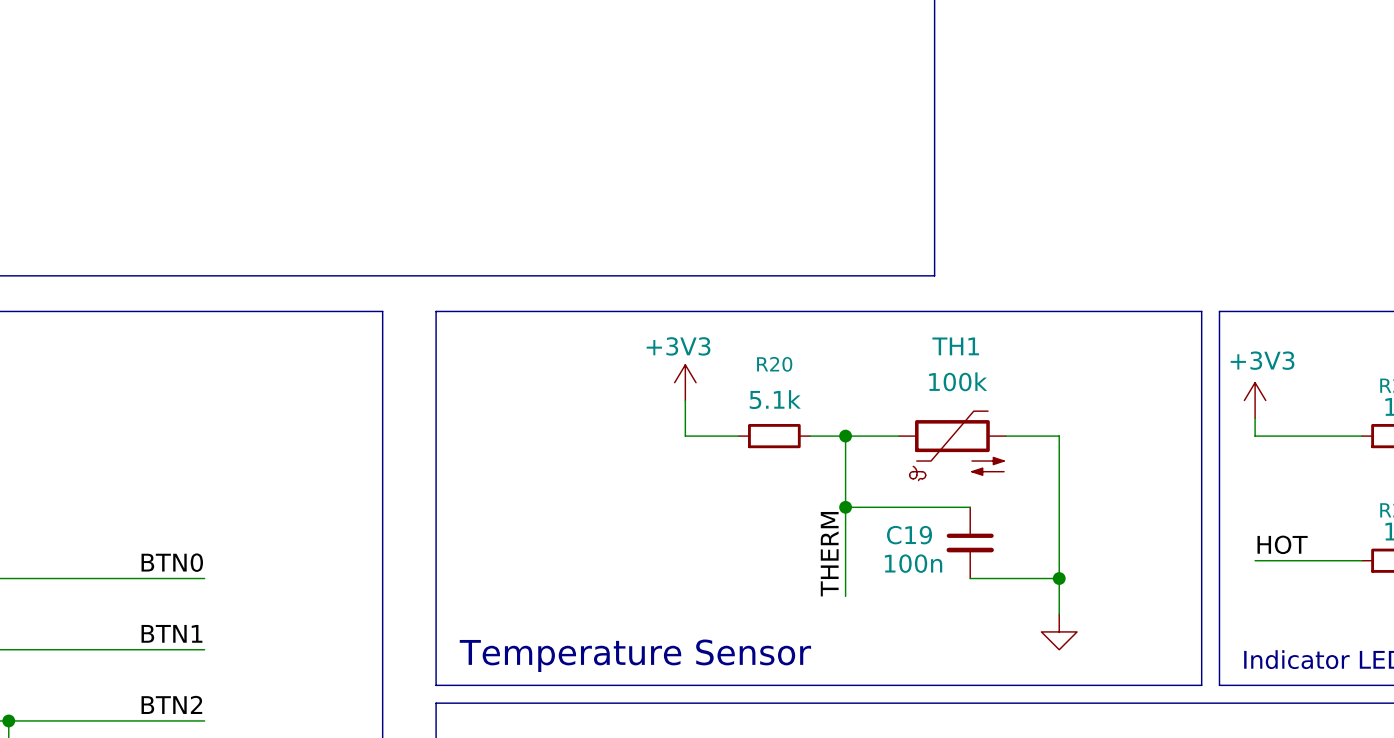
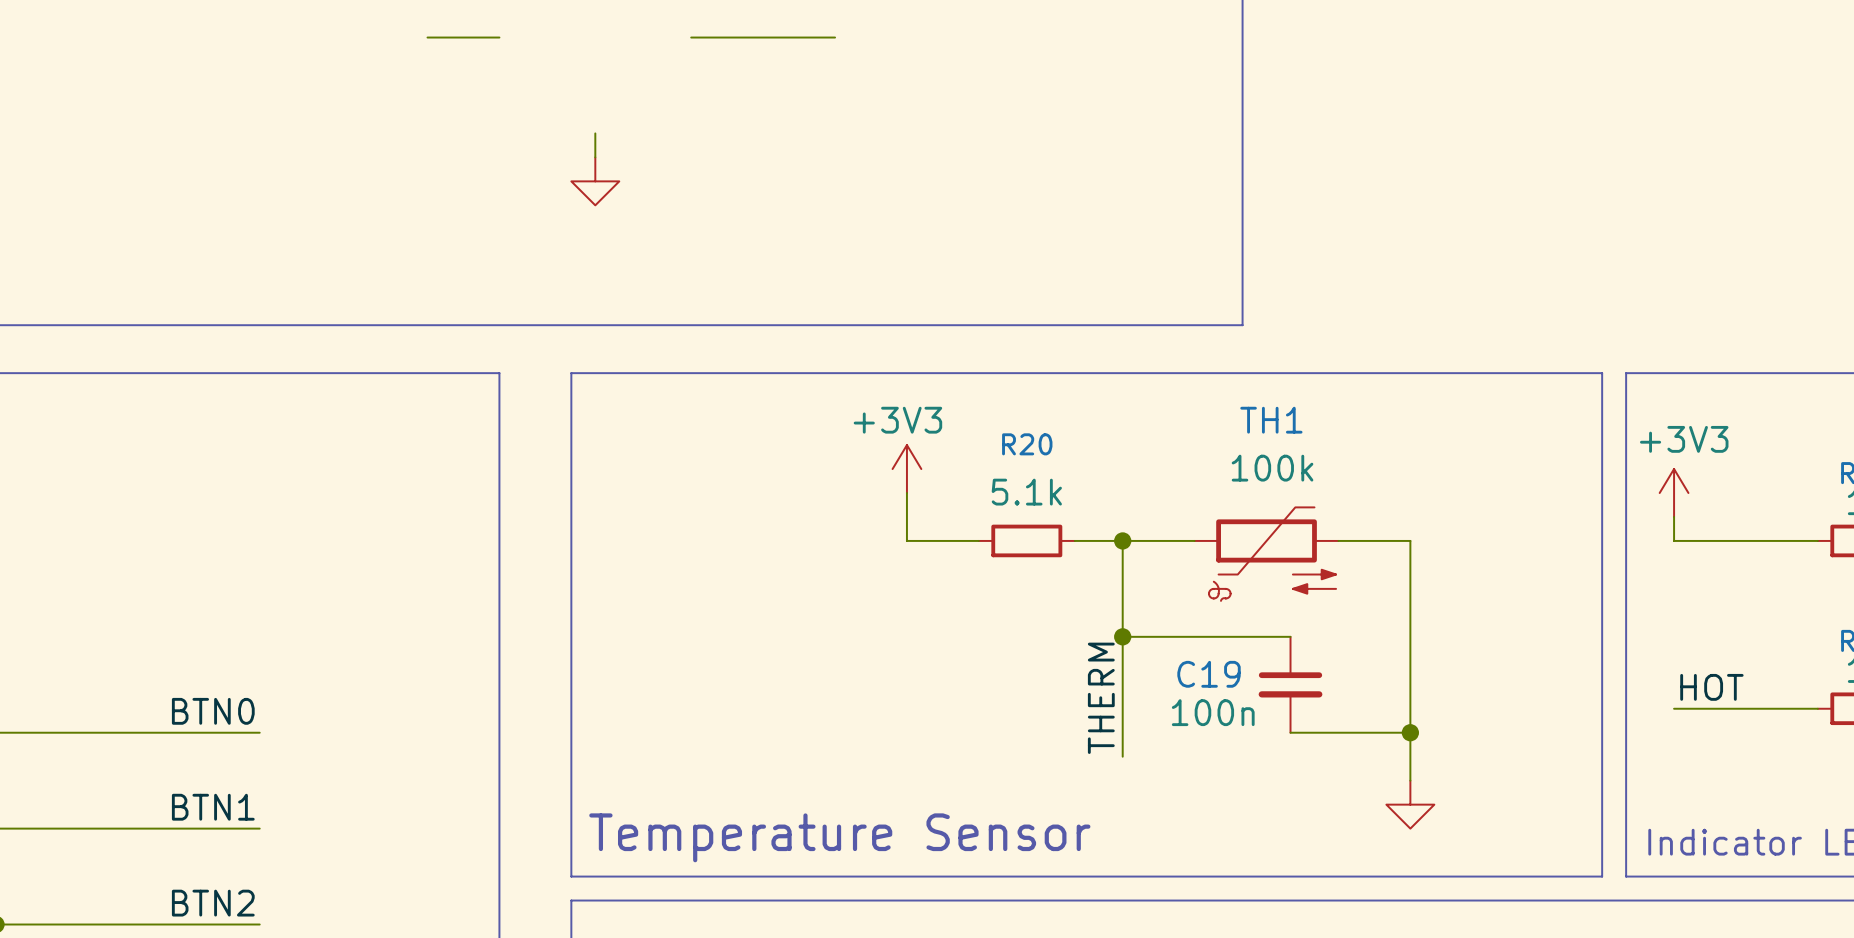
wire: none -> (427, 37) (499, 37)
wire: none -> (691, 37) (835, 37)
wire: none -> (595, 133) (595, 157)
power symbol: none -> (595, 181)

